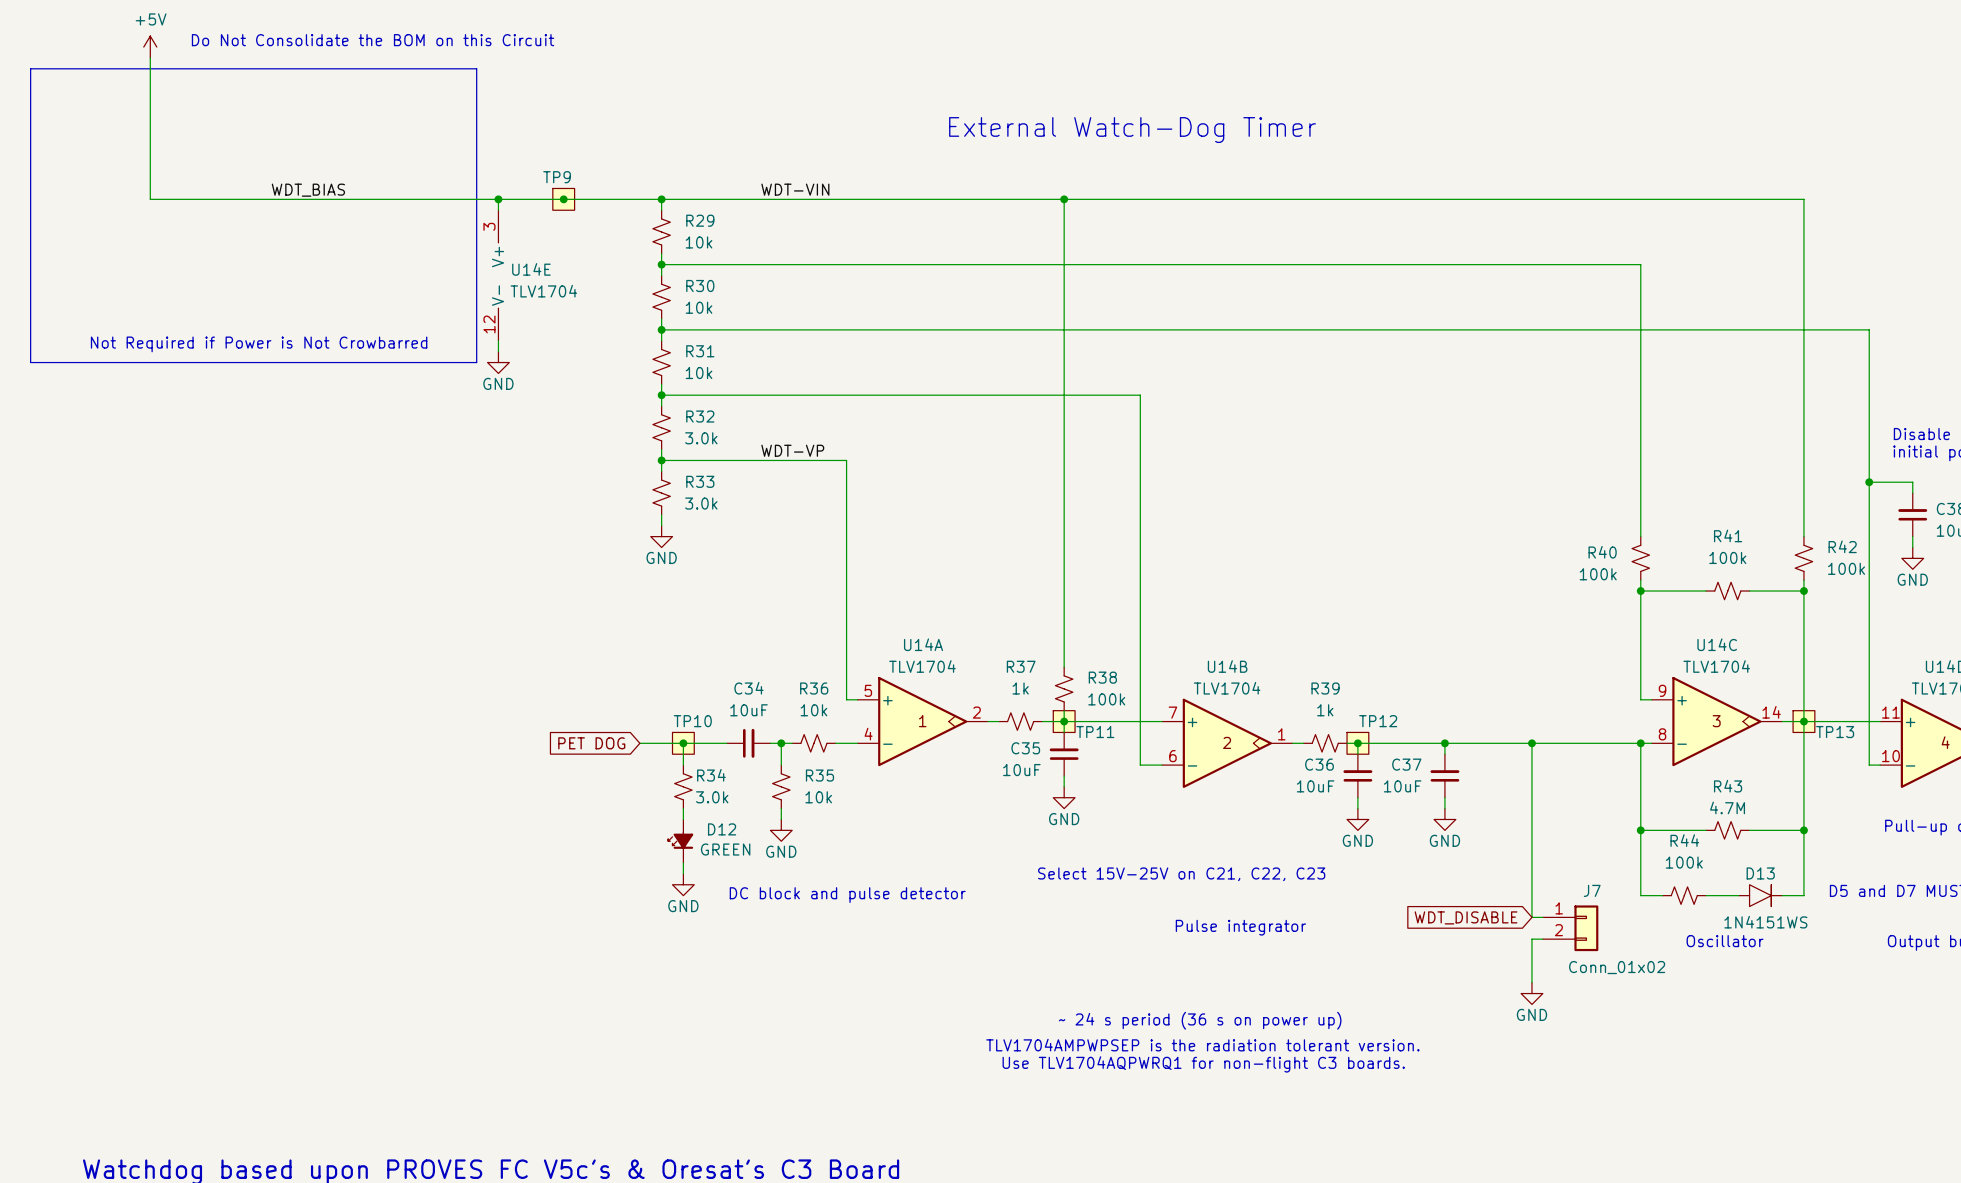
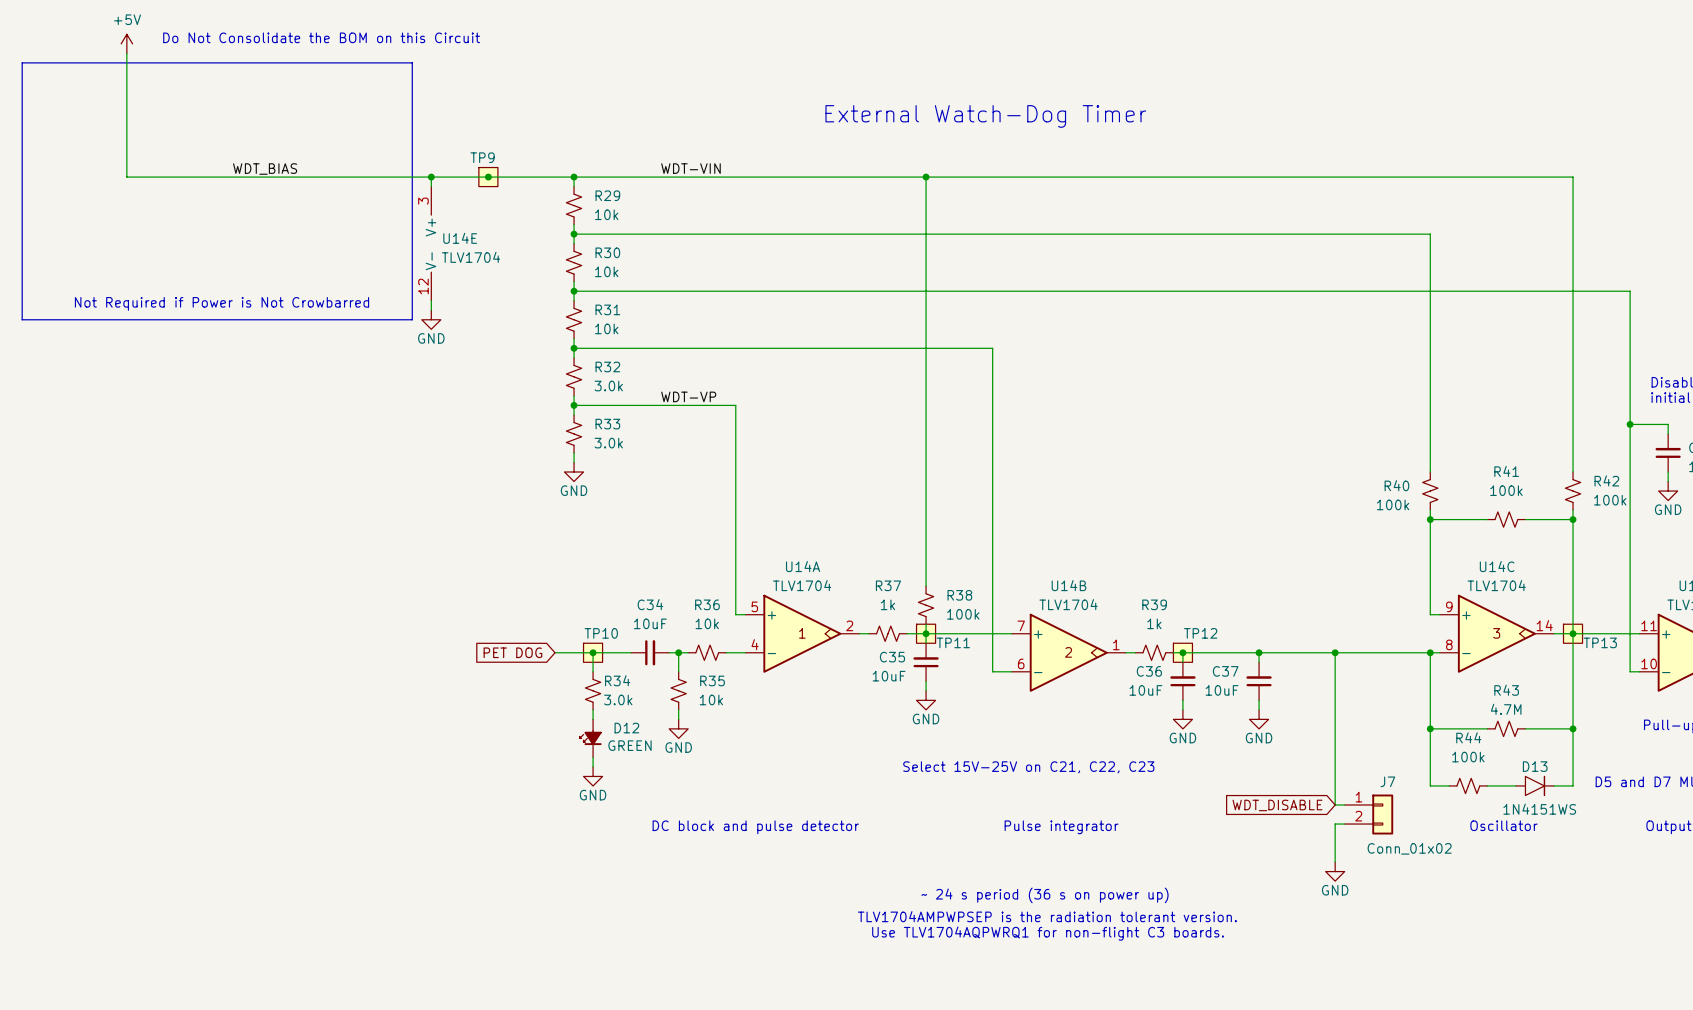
text position: DC block and pulse detector (847, 895) -> DC block and pulse detector (755, 827)
text position: Pulse integrator (1240, 927) -> Pulse integrator (1061, 827)

